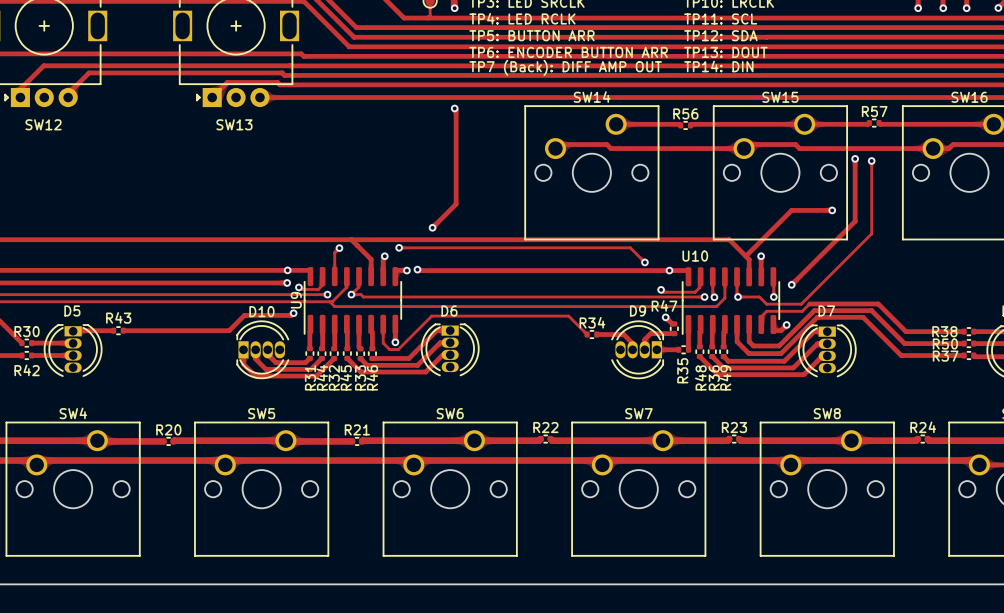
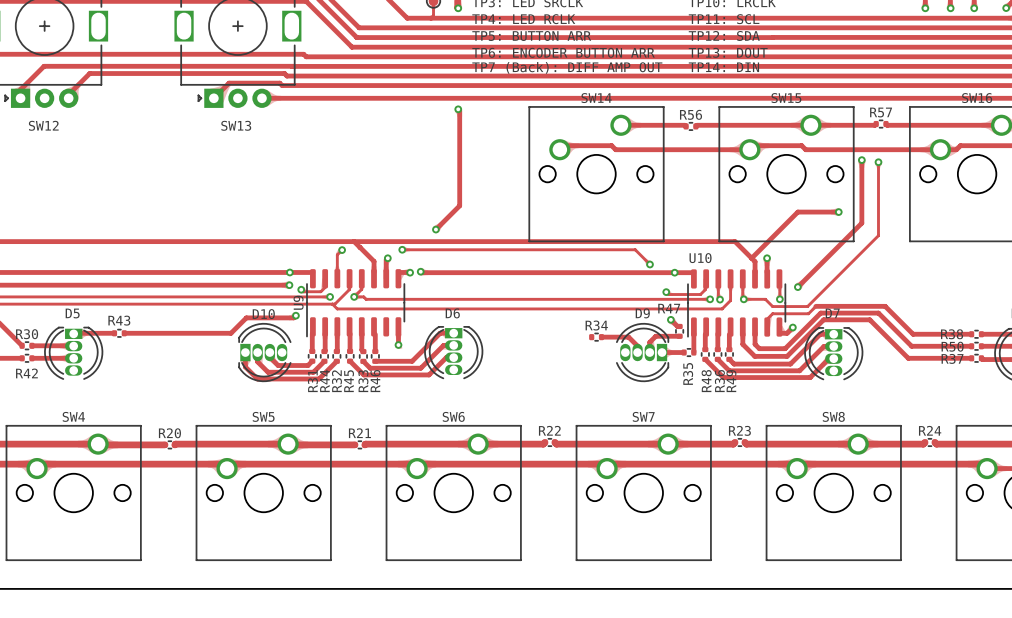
track: (383, 324) (383, 343) (389, 349) (398, 349) (431, 316) (568, 316) (587, 334) -> none

